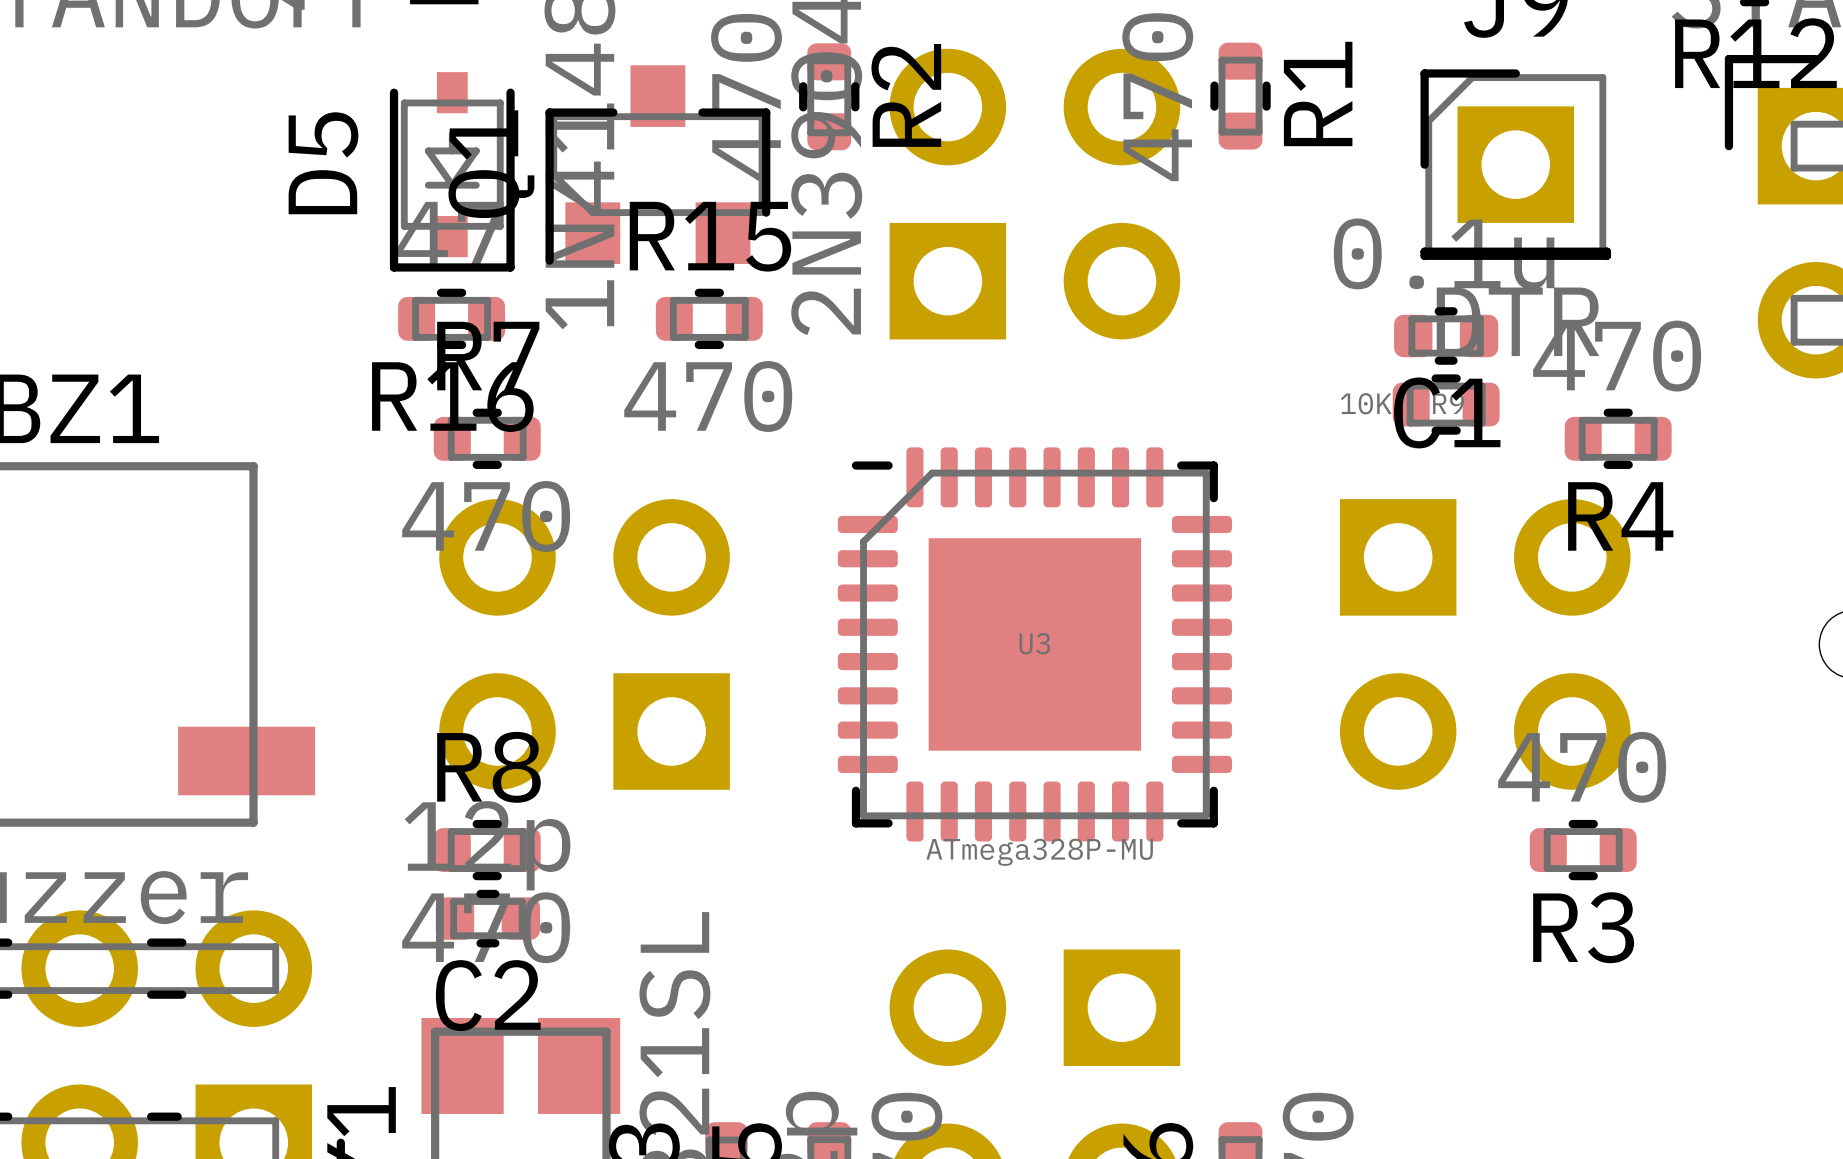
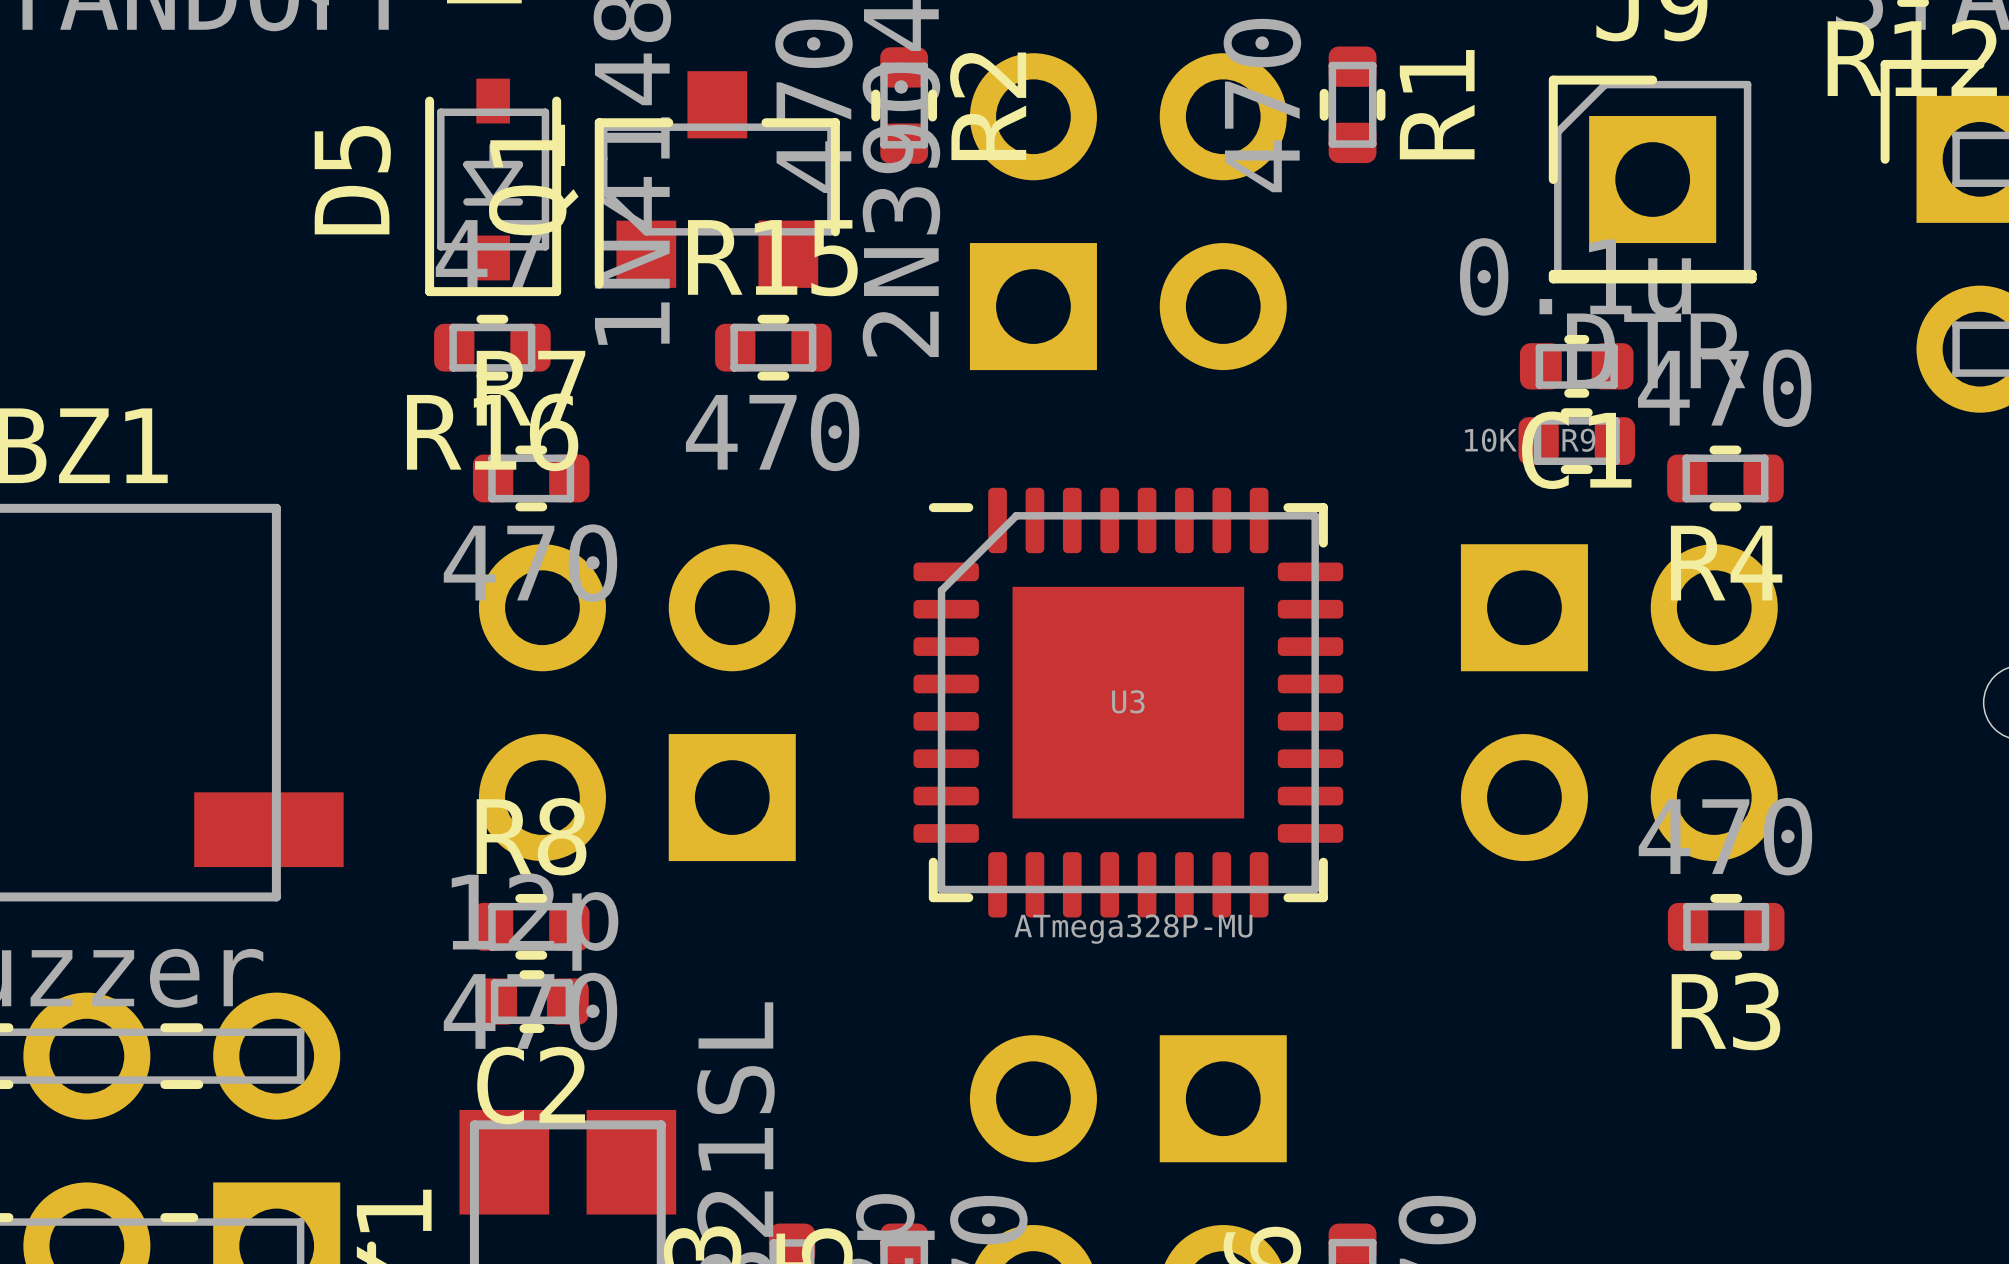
R4 position: (1618, 438) -> (1725, 478)

